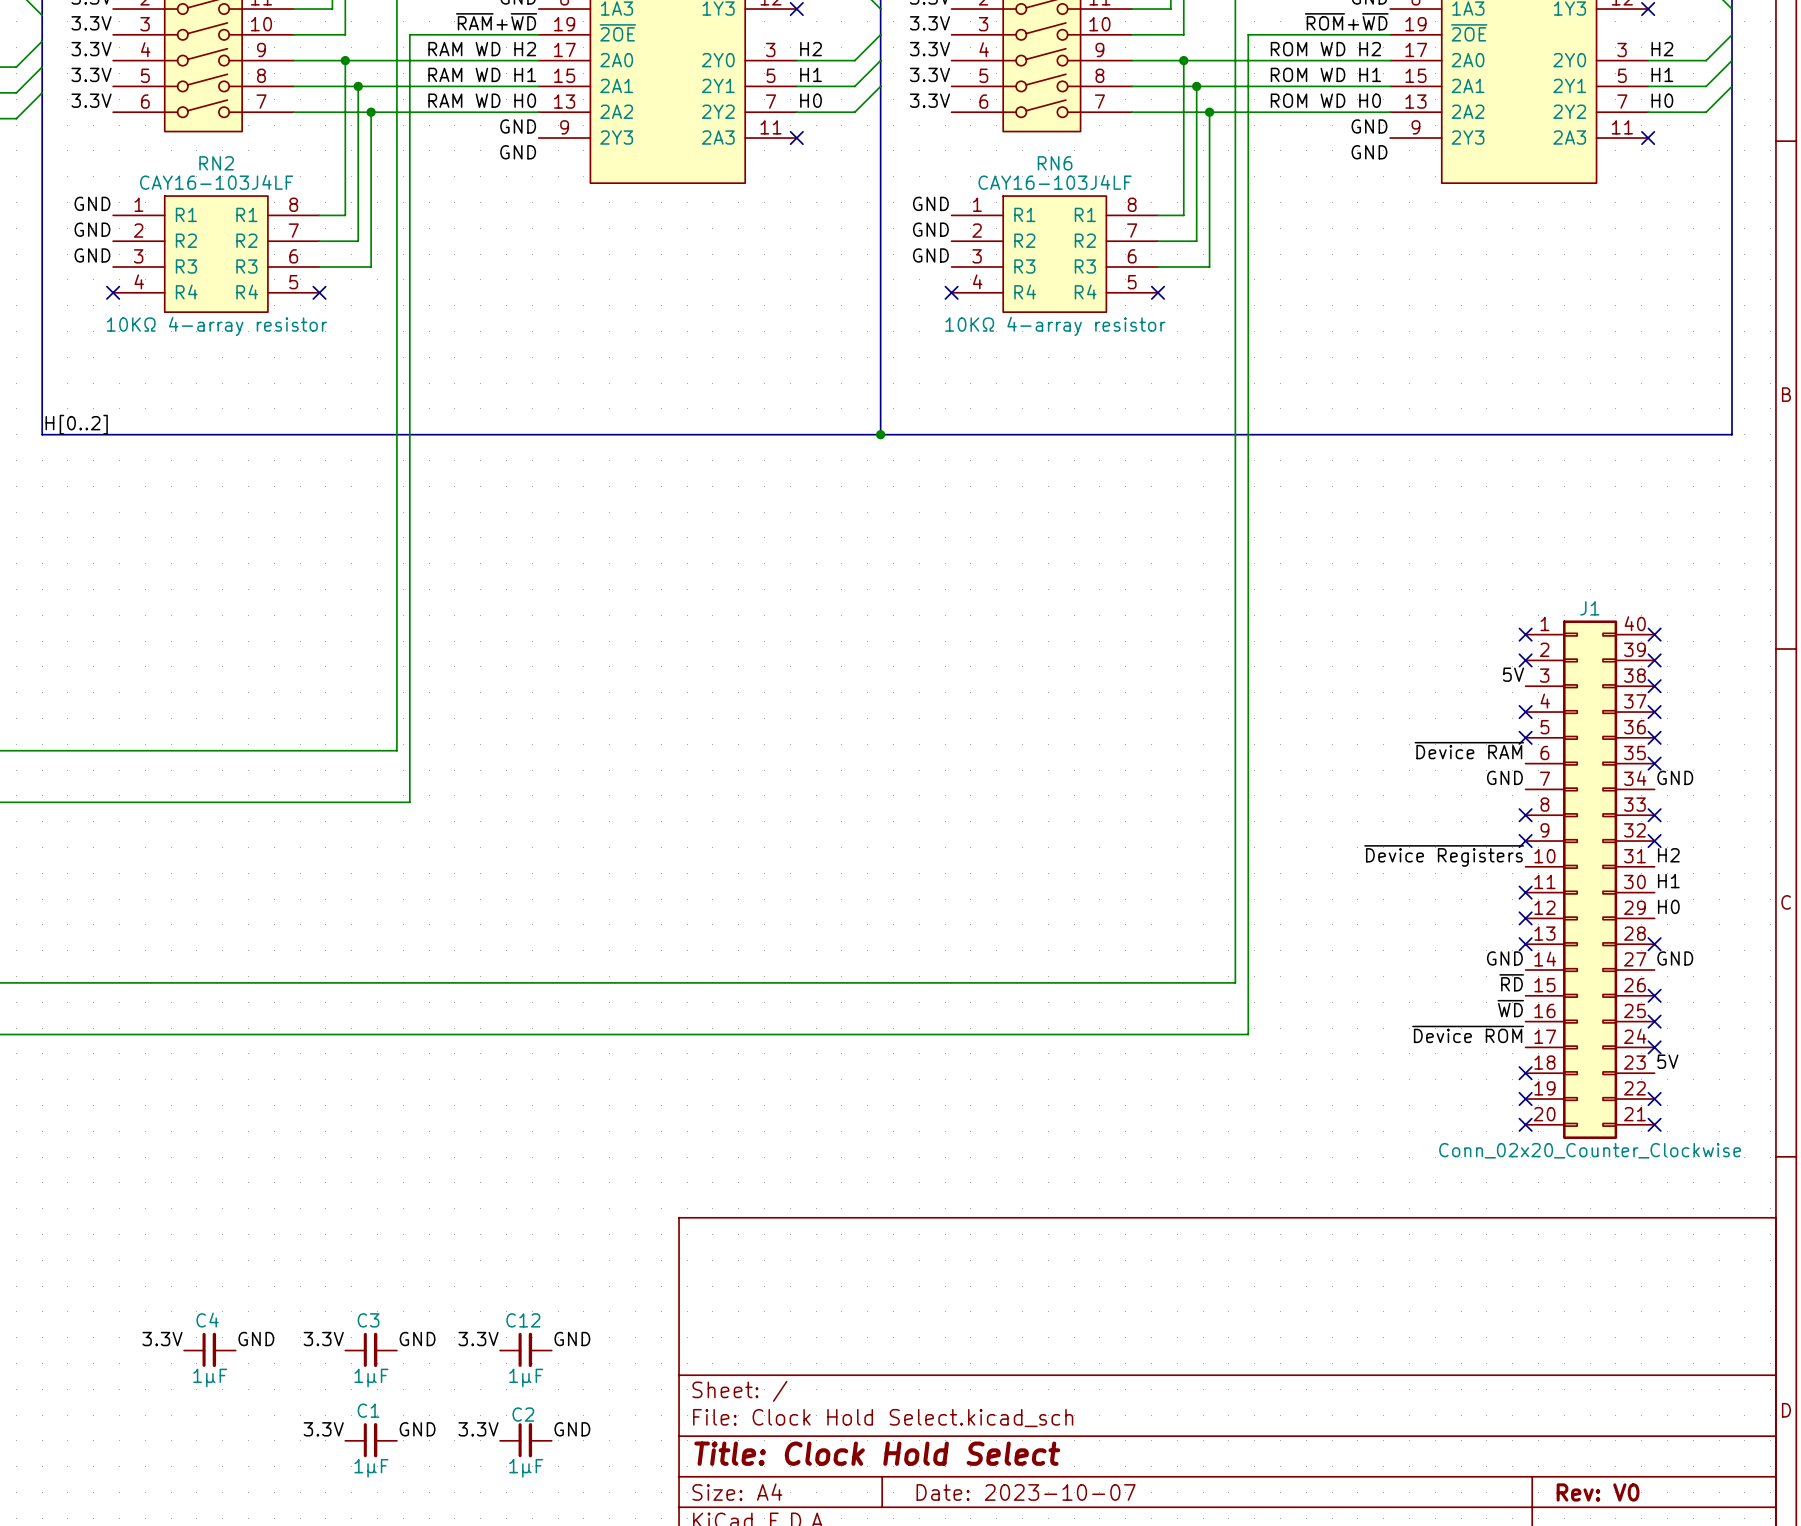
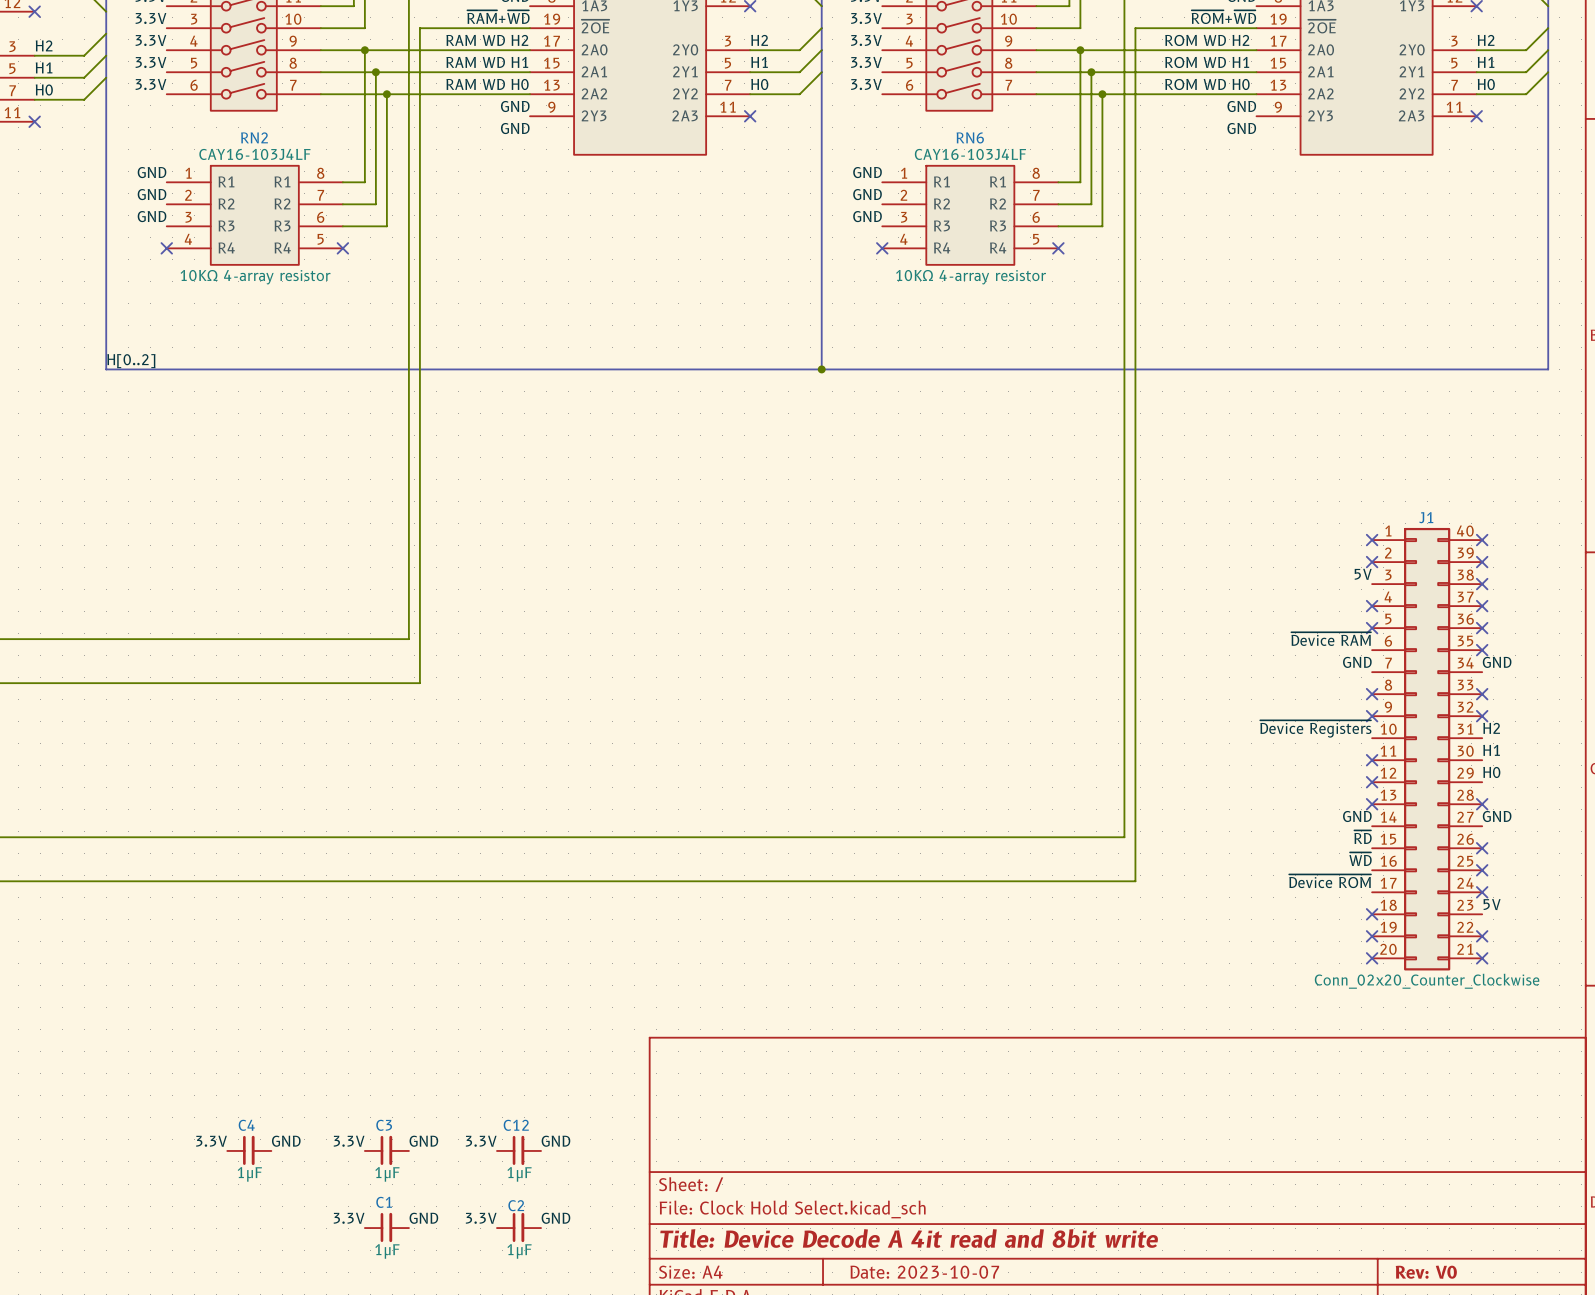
title block: Title: Clock Hold Select (877, 1453) -> Title: Device Decode A 4it read and 8bit write (909, 1238)

